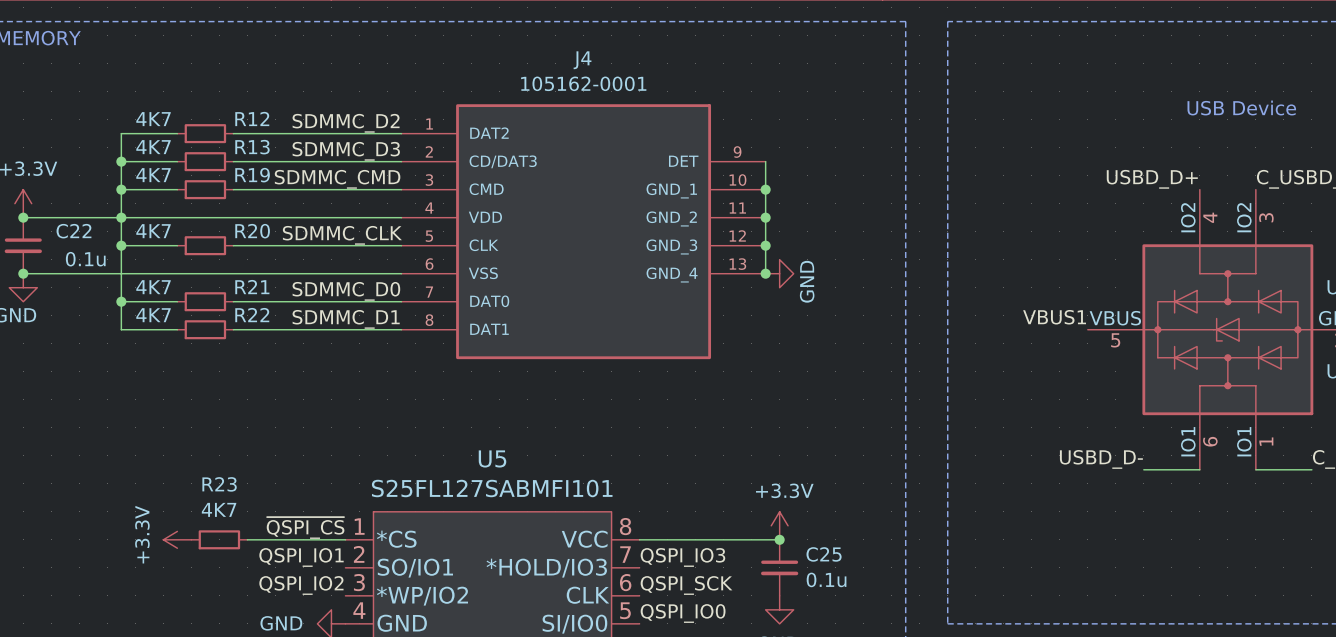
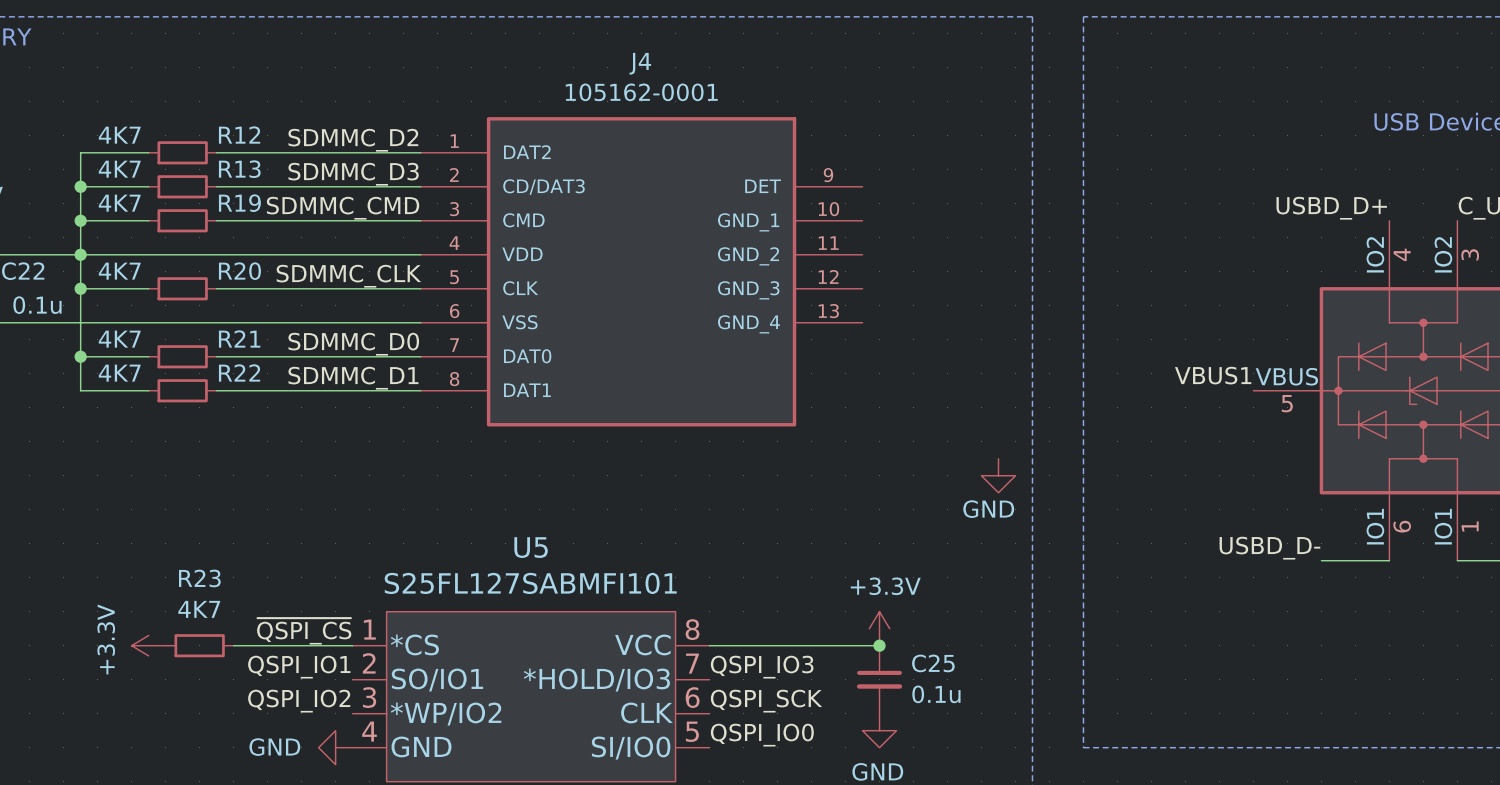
wire: (765, 161) (765, 273) -> none
junction: (765, 189) -> none
junction: (765, 217) -> none
junction: (765, 245) -> none
junction: (765, 273) -> none
power symbol rotation: 0° (779, 273) -> 90° clockwise (998, 475)
power symbol position: GND (779, 273) -> GND (998, 475)

